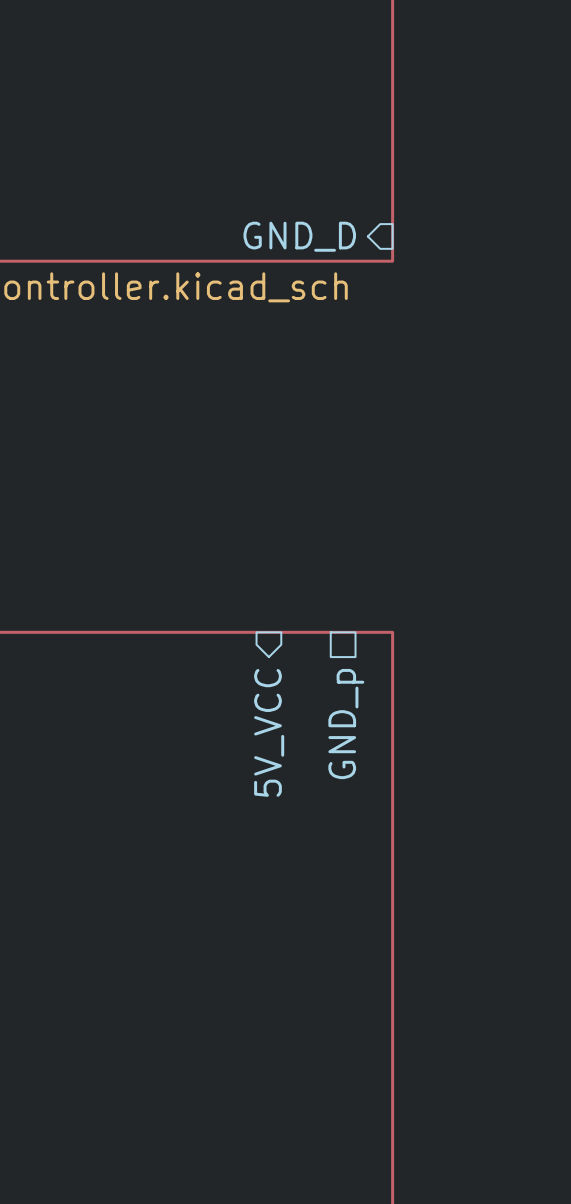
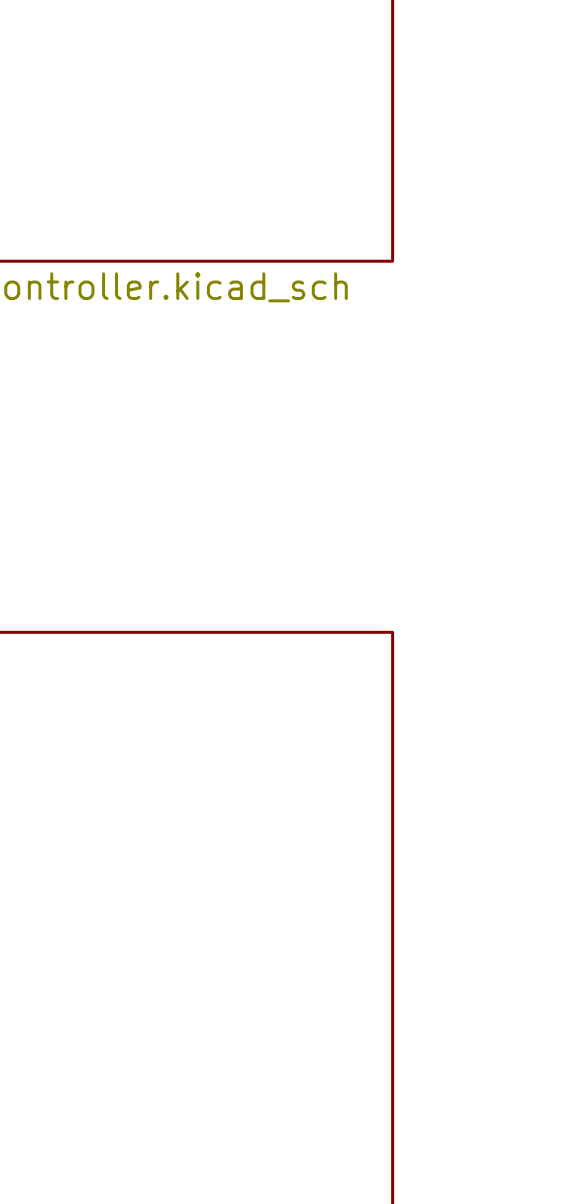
sheet pin: GND_D (299, 236) -> none
sheet pin: GND_p (346, 724) -> none
sheet pin: 5V_VCC (269, 732) -> none

